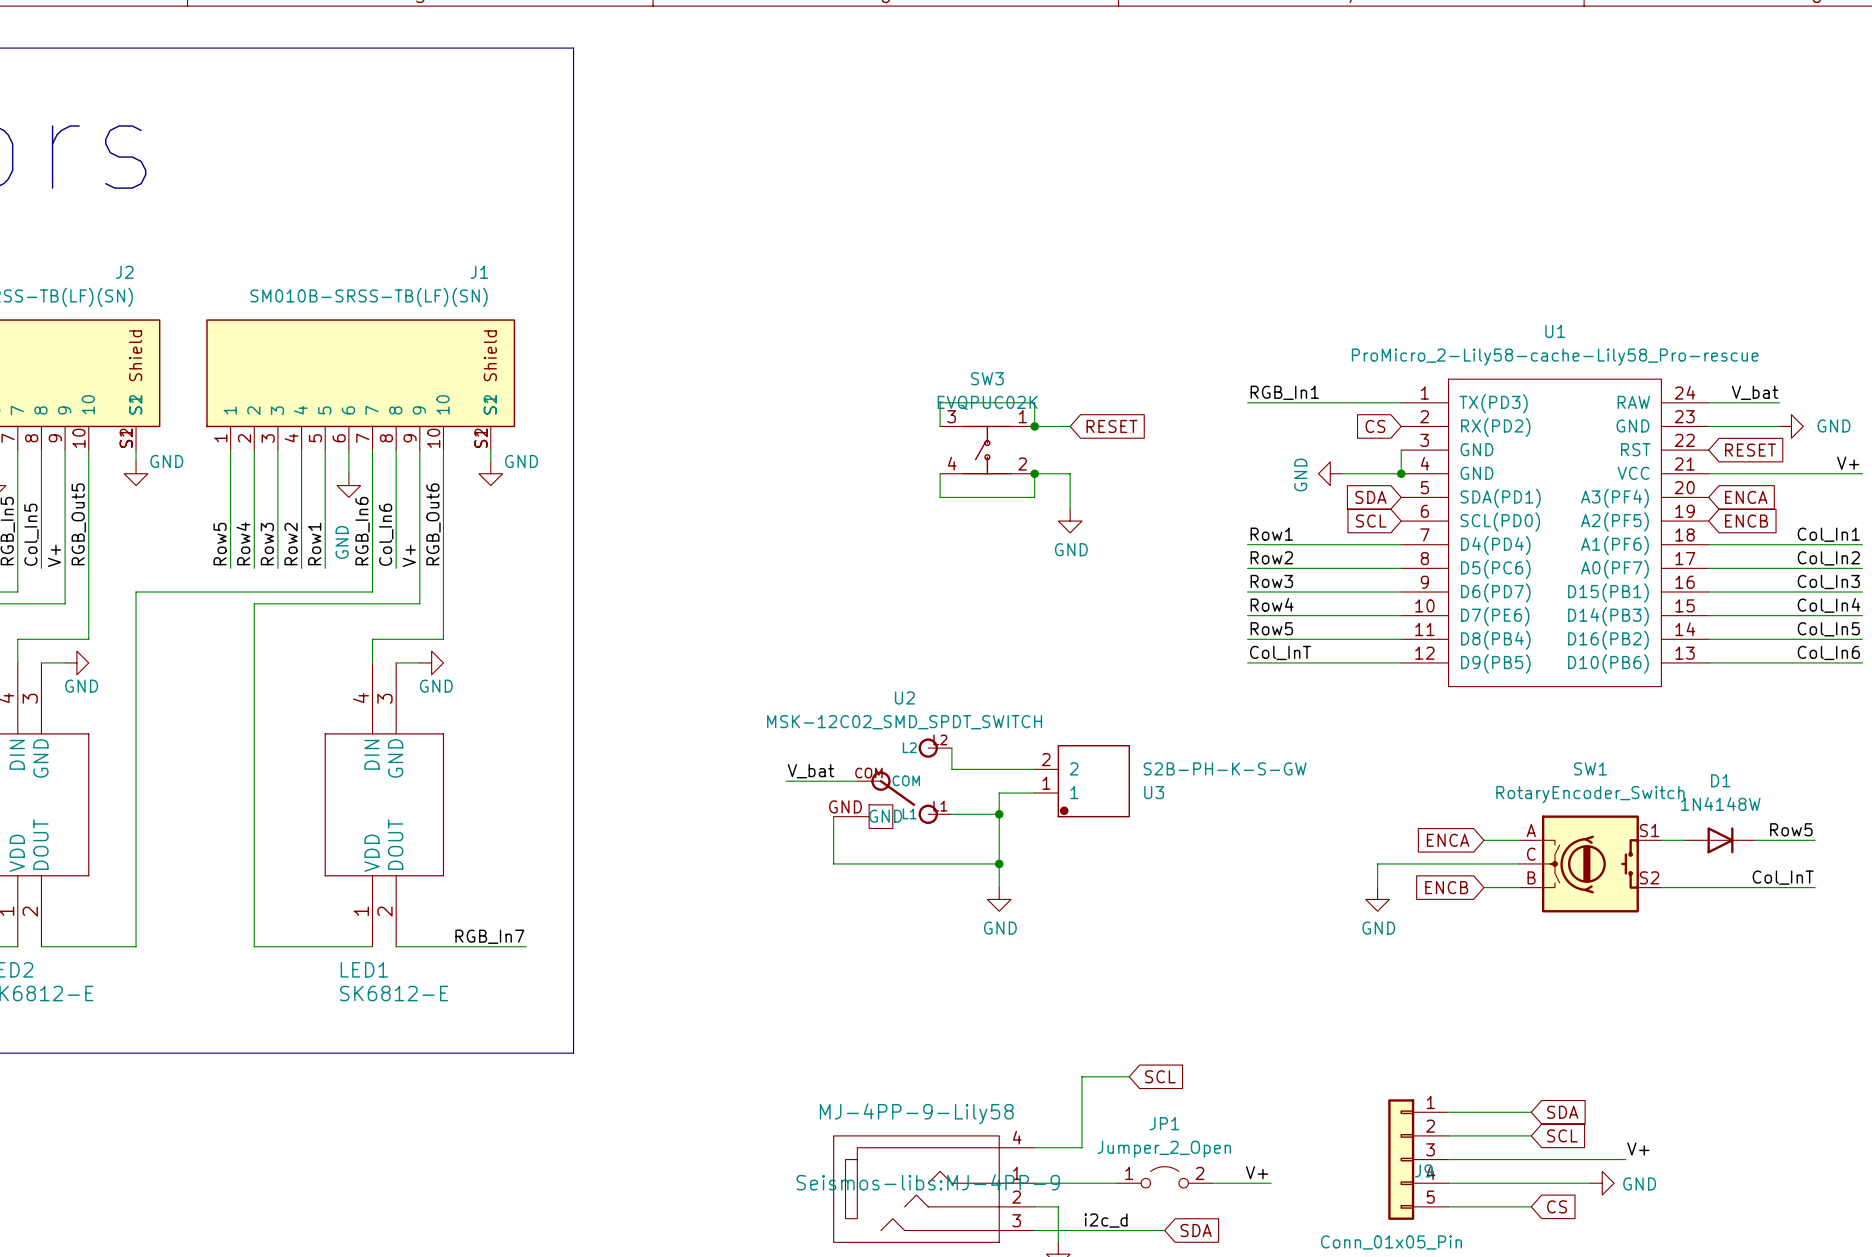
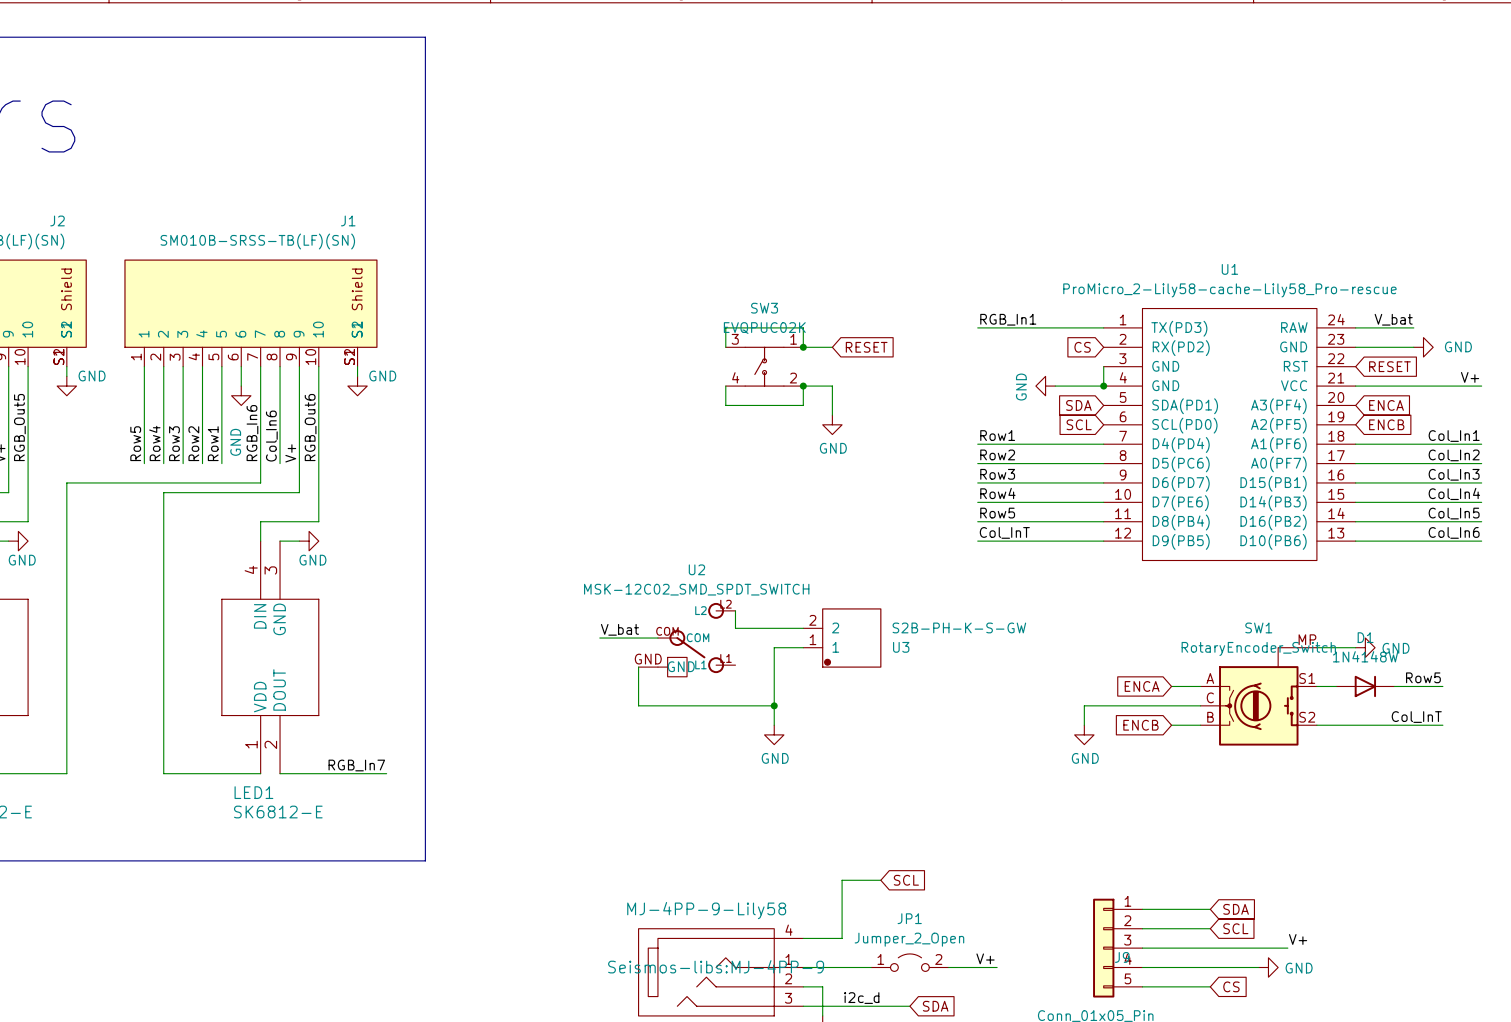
wire: none -> (1316, 647) (1355, 647)
power symbol: none -> GND (1365, 647)
wire: (951, 814) (999, 814) -> none
junction: (999, 814) -> none
SW1 symbol: [1519, 815, 1662, 913] -> [1200, 647, 1317, 746]

